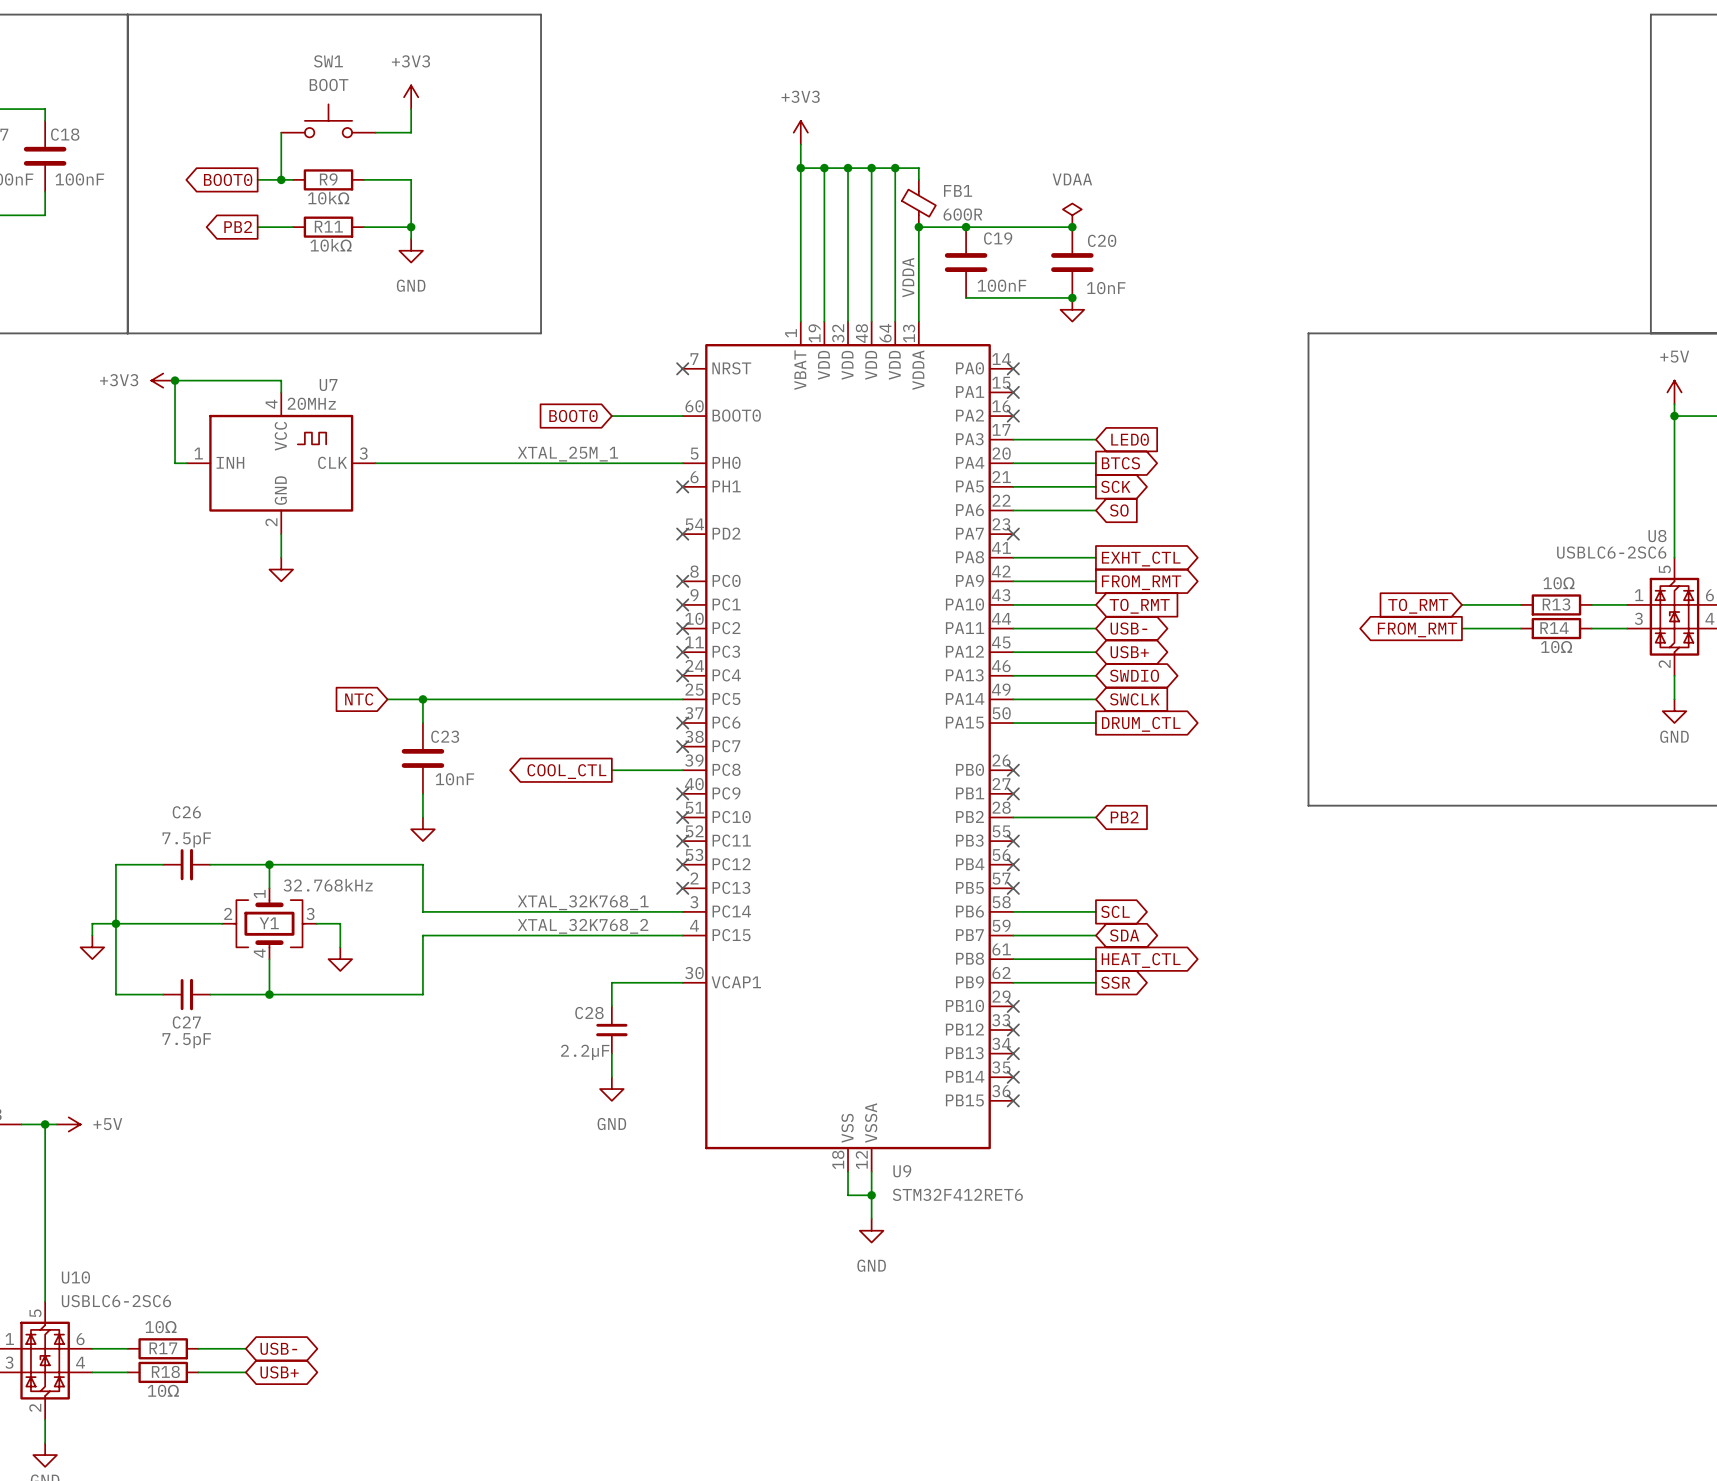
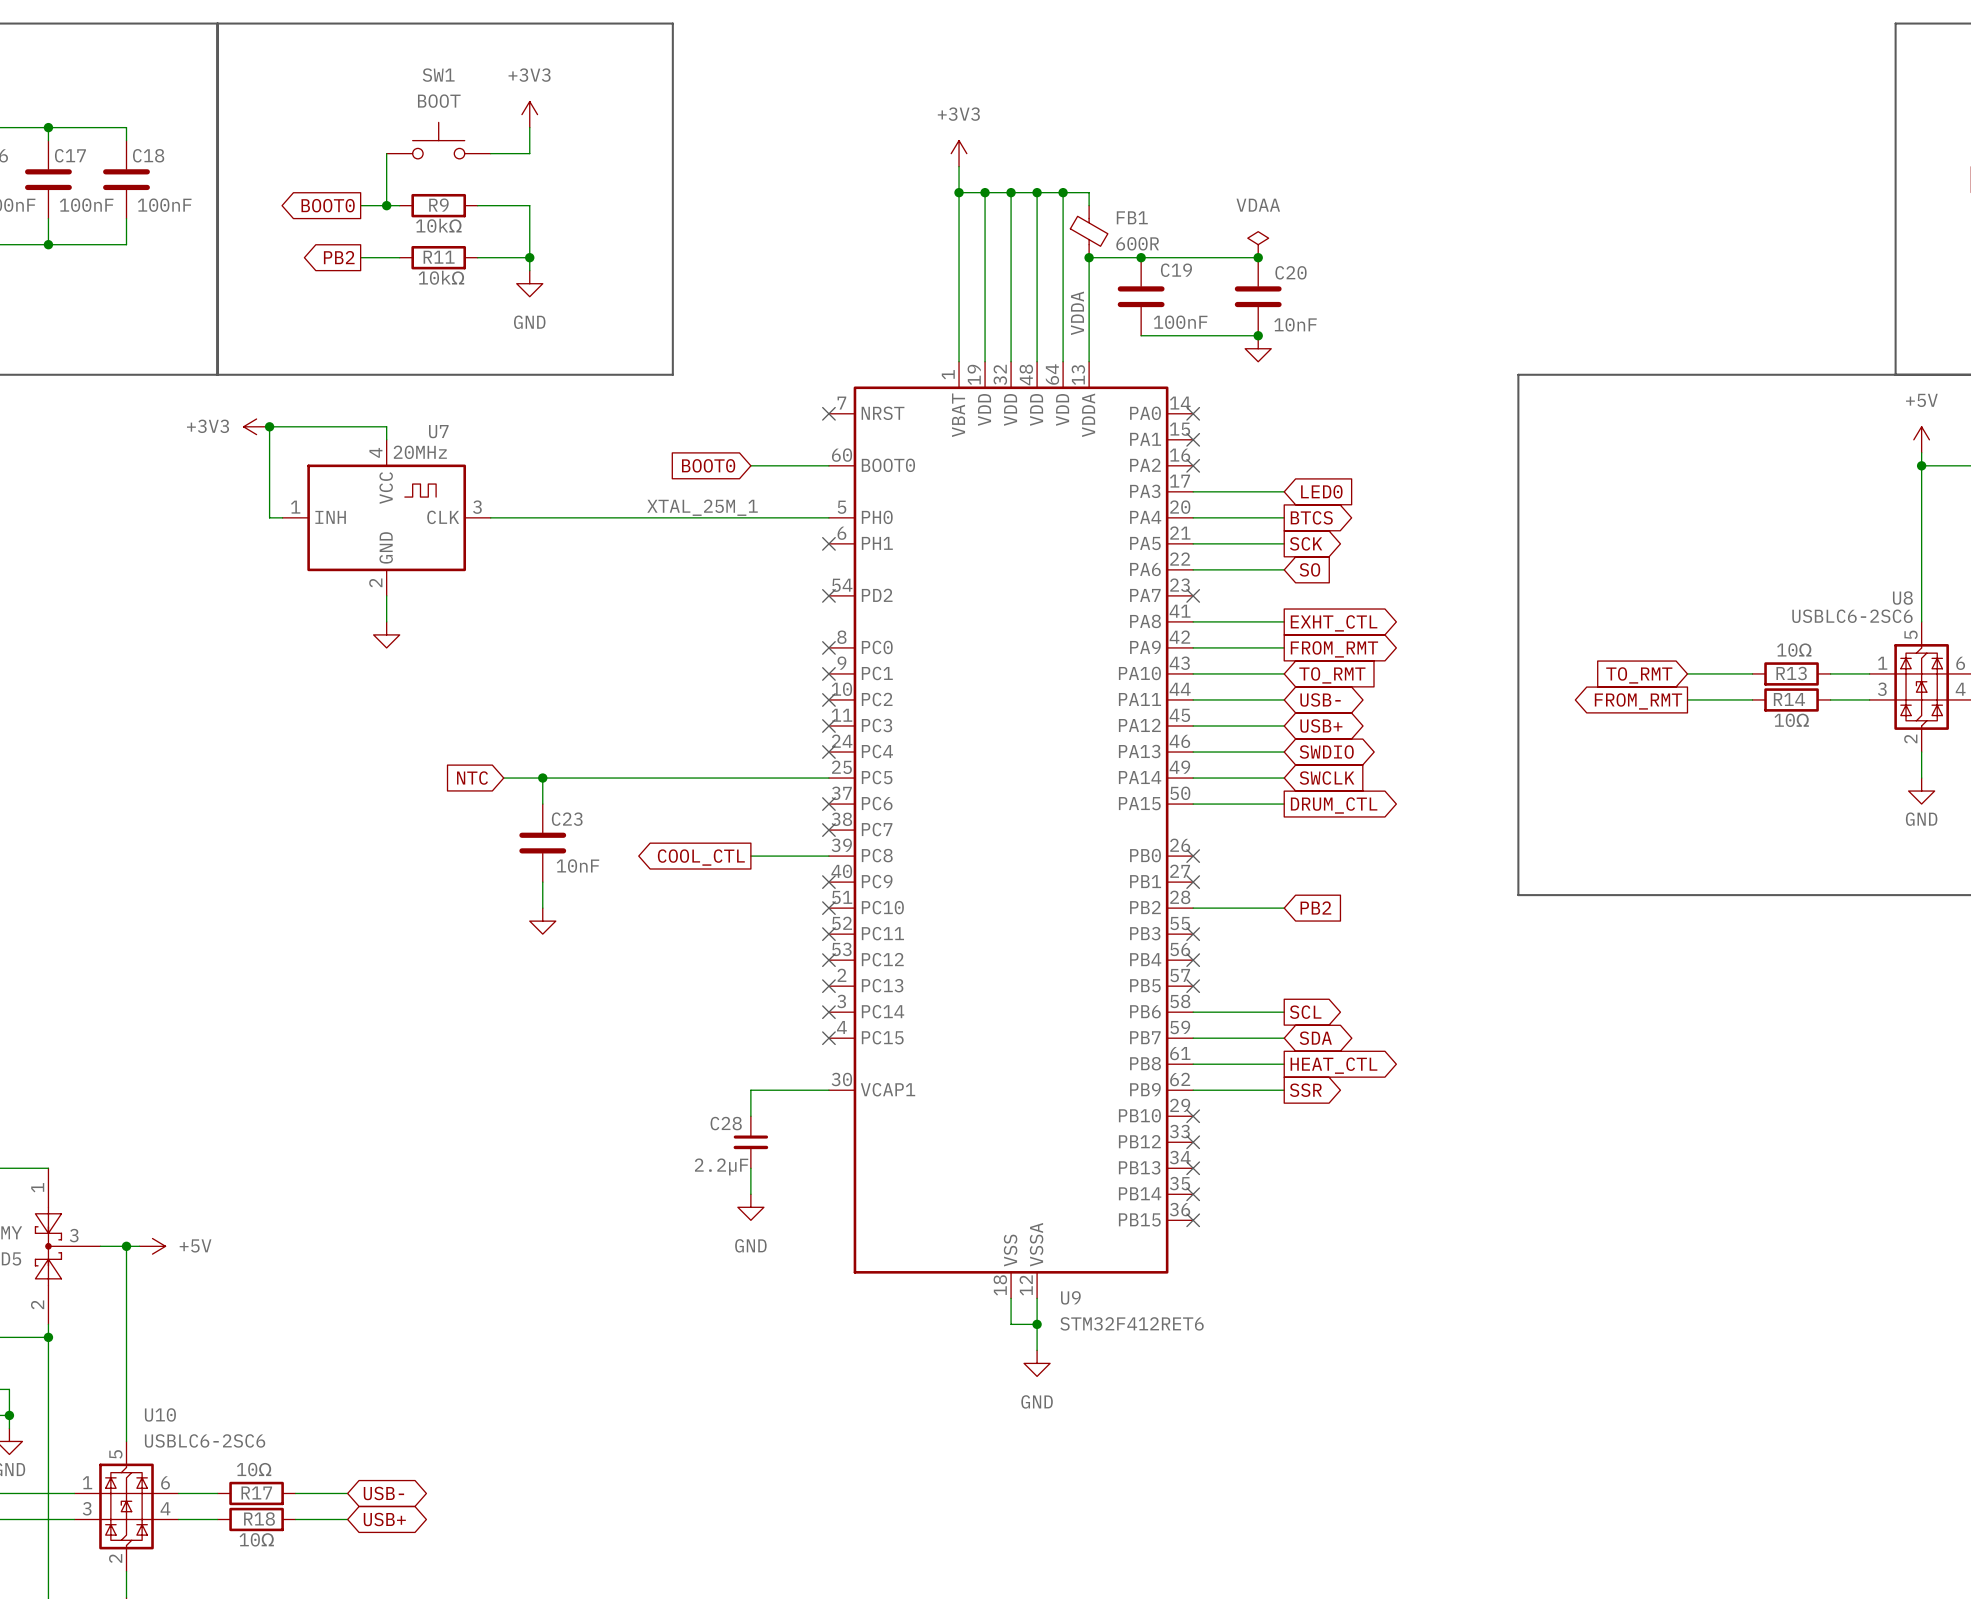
wire: (163, 864) (115, 864) (115, 994) (163, 994) -> none
C26: 7.5pF (186, 864) -> none
wire: (210, 864) (422, 864) (422, 911) (682, 911) -> none
wire: (269, 864) (269, 888) -> none
junction: (269, 864) -> none
label: XTAL_32K768_1 (583, 902) -> none
no-connect mark: none -> (828, 1012)
junction: (115, 923) -> none
wire: (222, 923) (92, 923) (92, 935) -> none
Y1: 32.768kHz (269, 923) -> none
wire: (316, 923) (340, 923) (340, 947) -> none
label: XTAL_32K768_2 (583, 926) -> none
wire: (682, 935) (422, 935) (422, 994) (210, 994) -> none
no-connect mark: none -> (828, 1038)
power symbol: (92, 947) -> none
wire: (269, 959) (269, 994) -> none
power symbol: (340, 959) -> none
C27: 7.5pF (186, 994) -> none
junction: (269, 994) -> none

